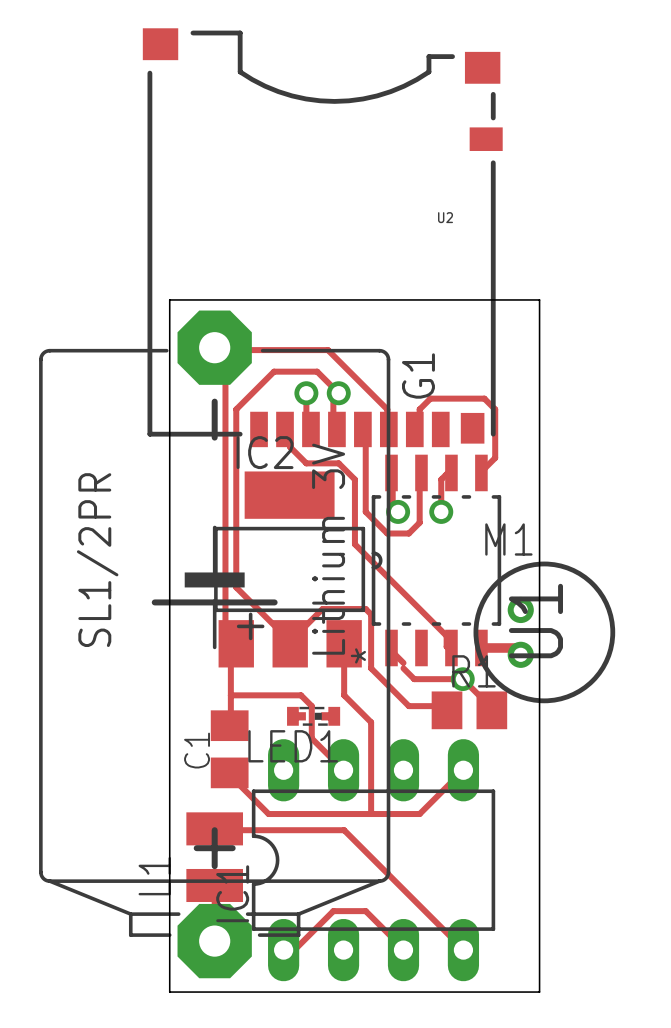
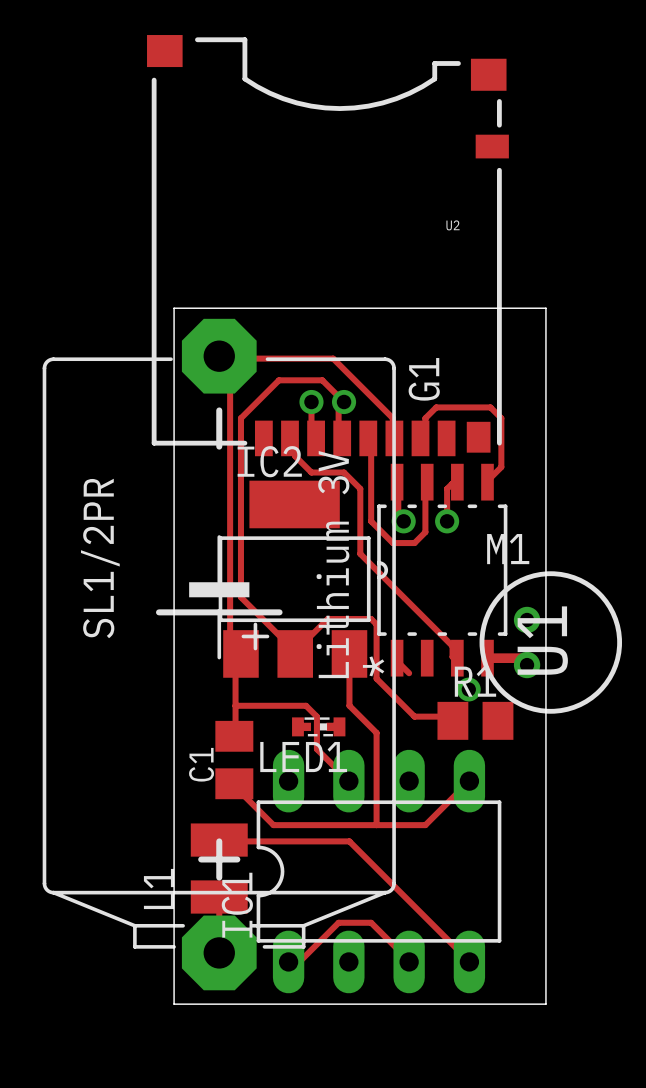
track: (403, 668) (414, 679) (462, 679) (491, 710) -> none

